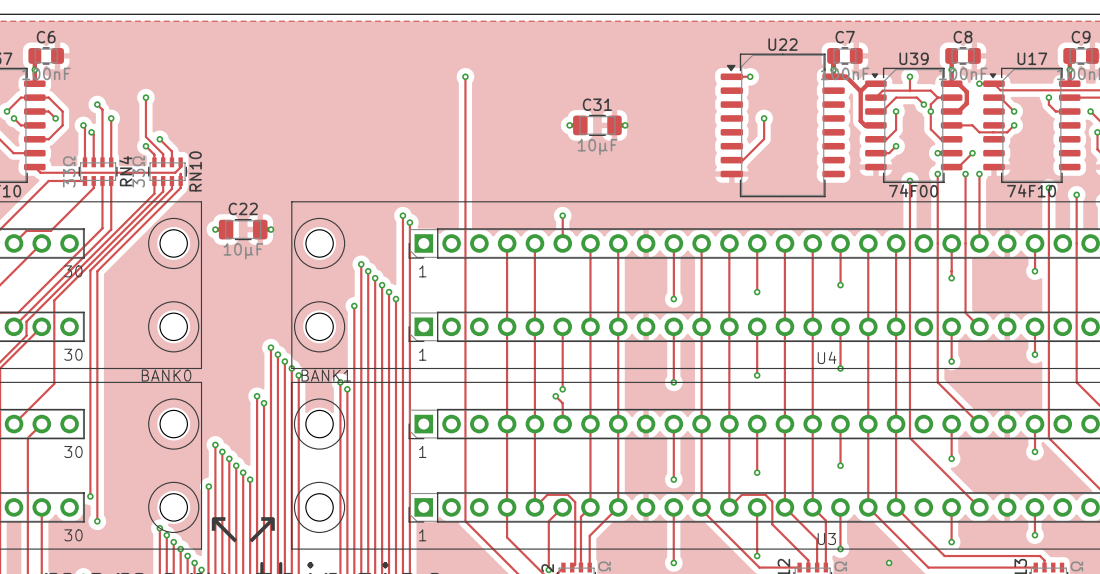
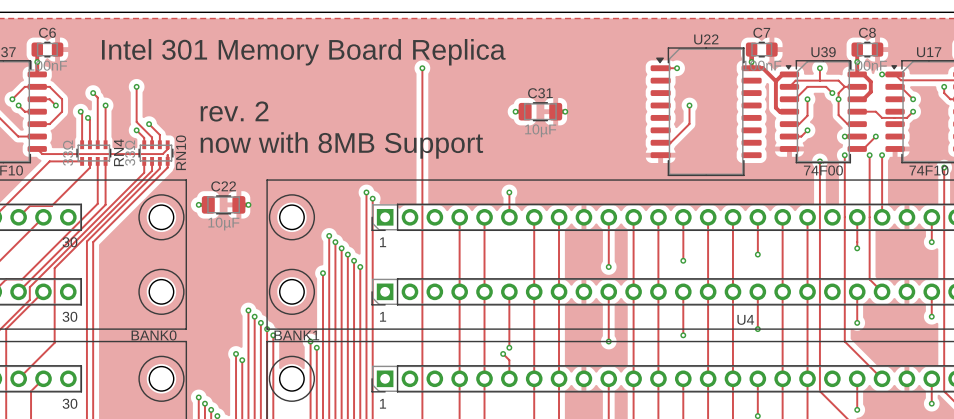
text: none -> Intel 301 Memory Board Replica (303, 52)
text: none -> rev. 2 (234, 111)
text: none -> now with 8MB Support (341, 145)

